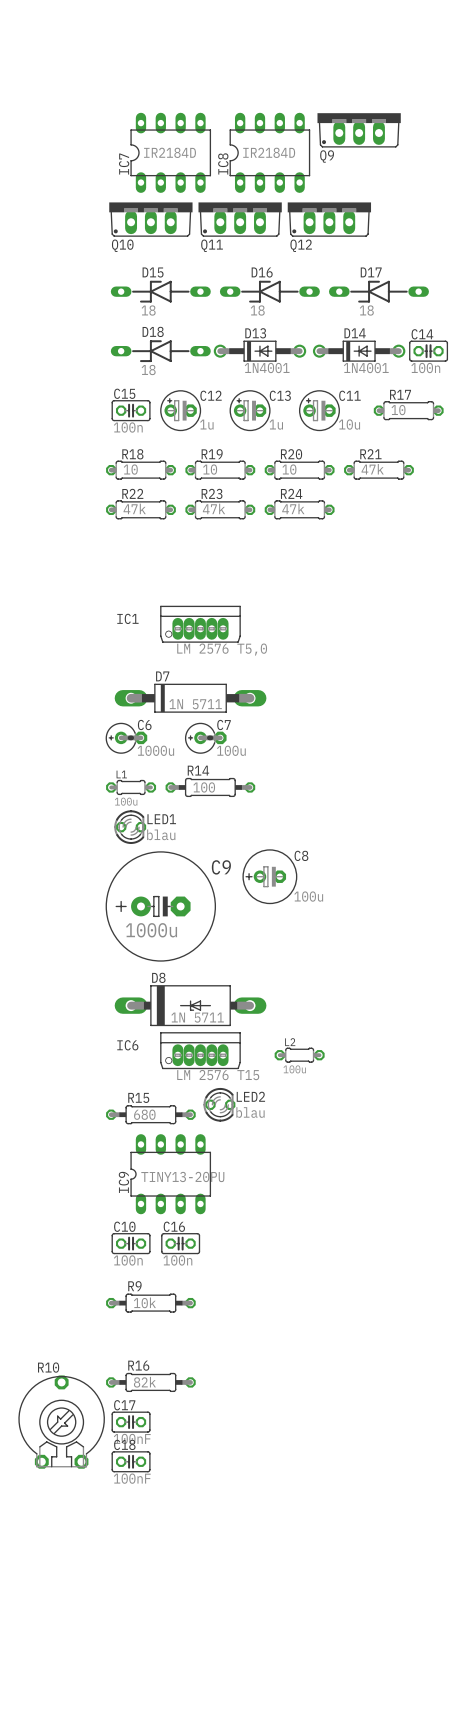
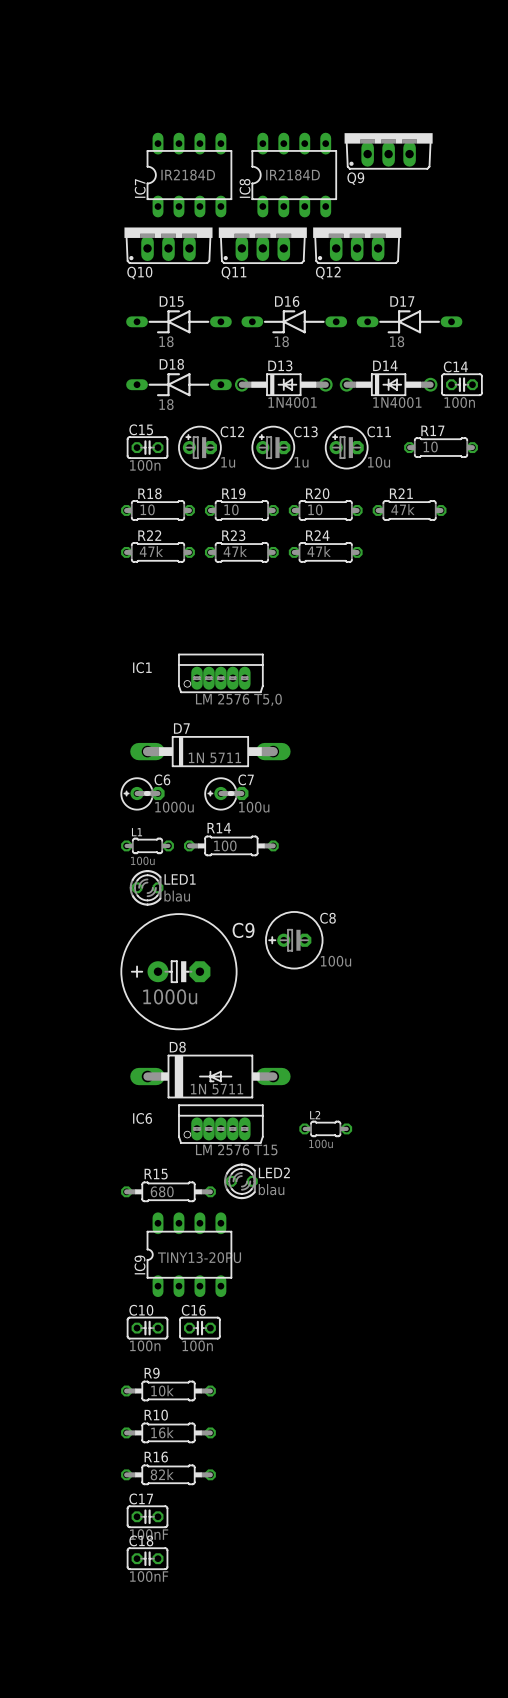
R10 value: none -> 16k (162, 1432)
R10 name position: R10 (48, 1367) -> R10 (156, 1415)
R10 footprint: [18, 1375, 105, 1469] -> [121, 1422, 216, 1443]

